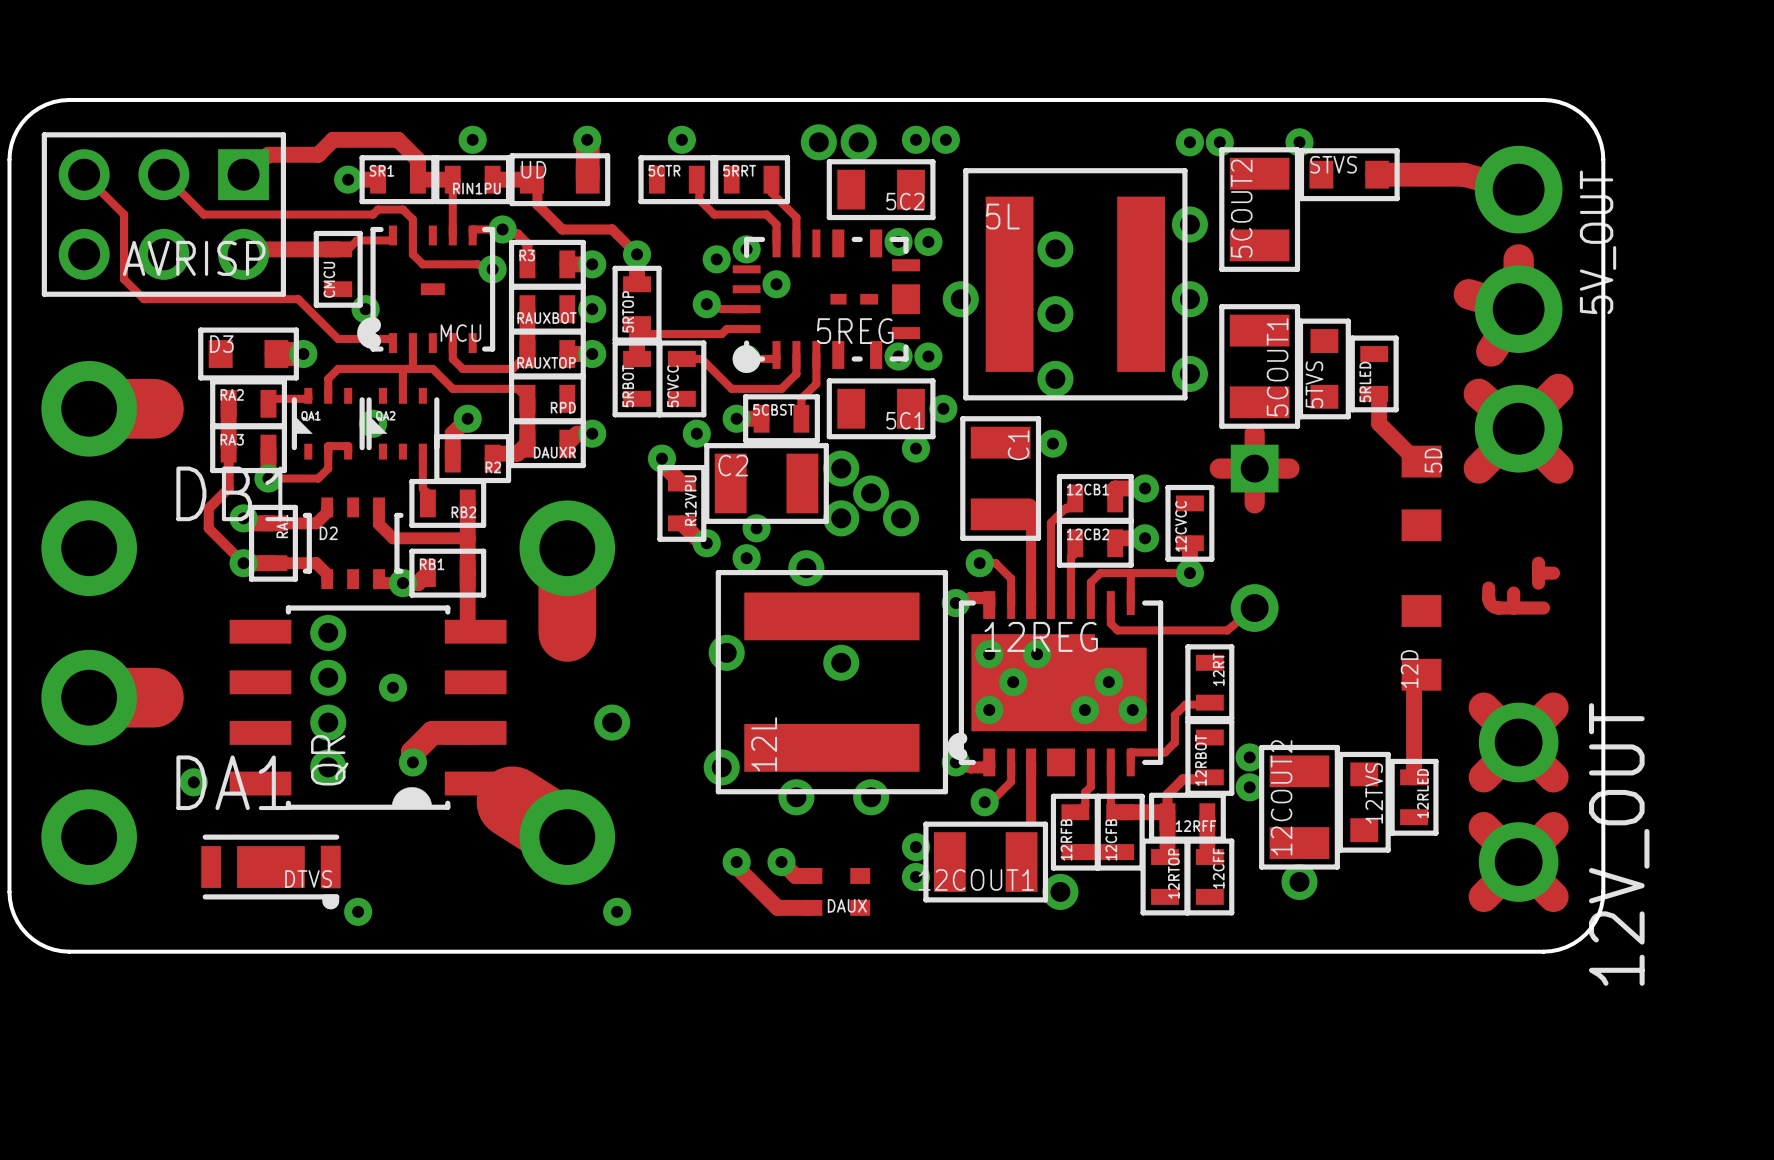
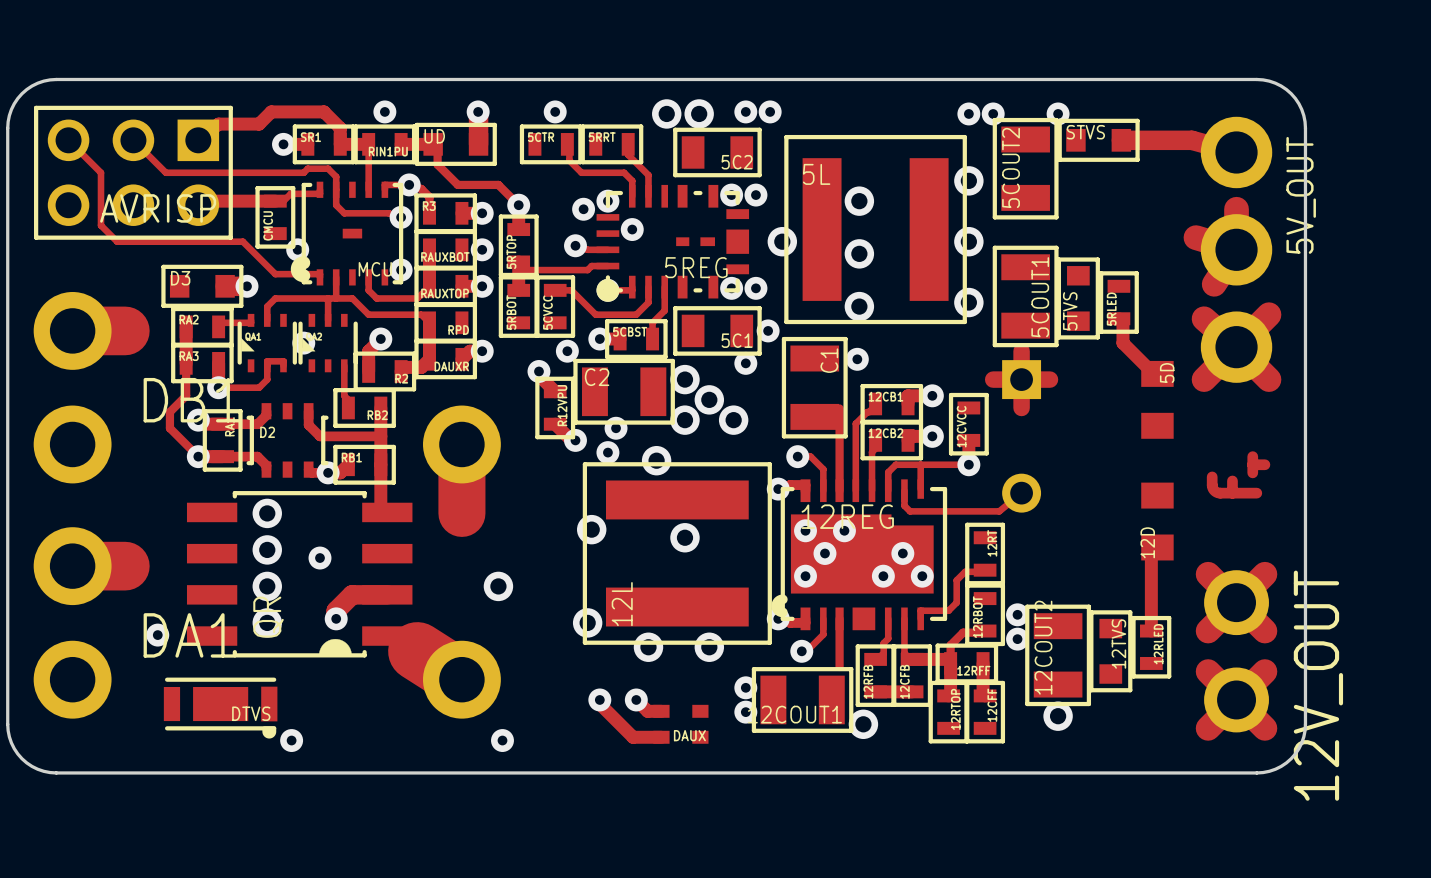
via: none -> (401, 270)

